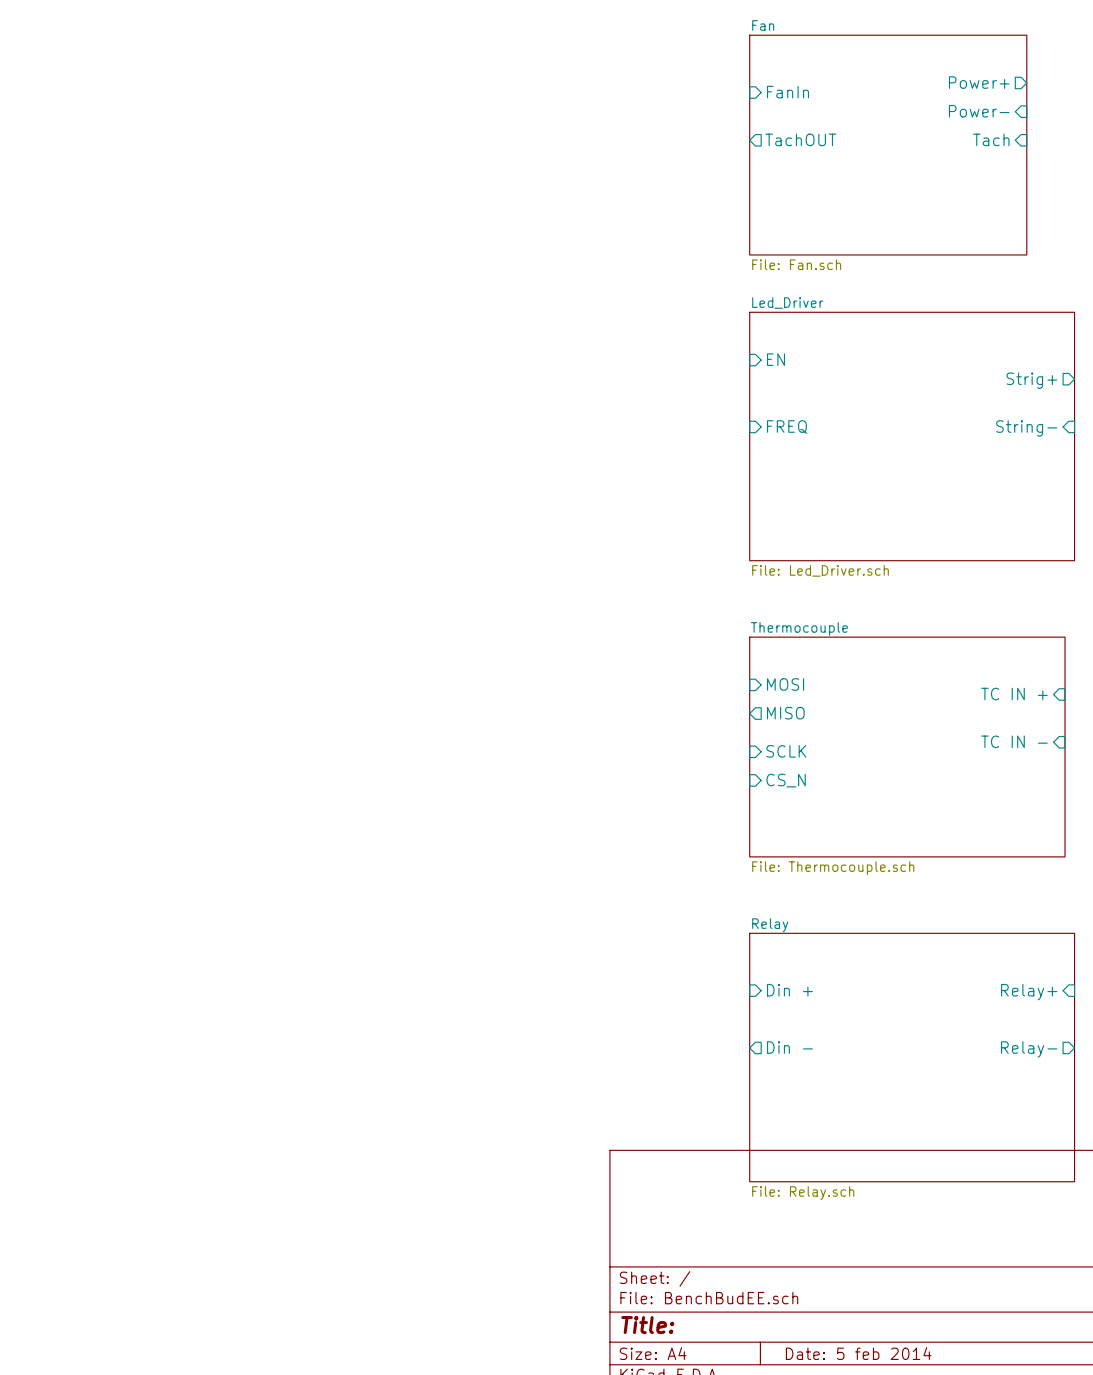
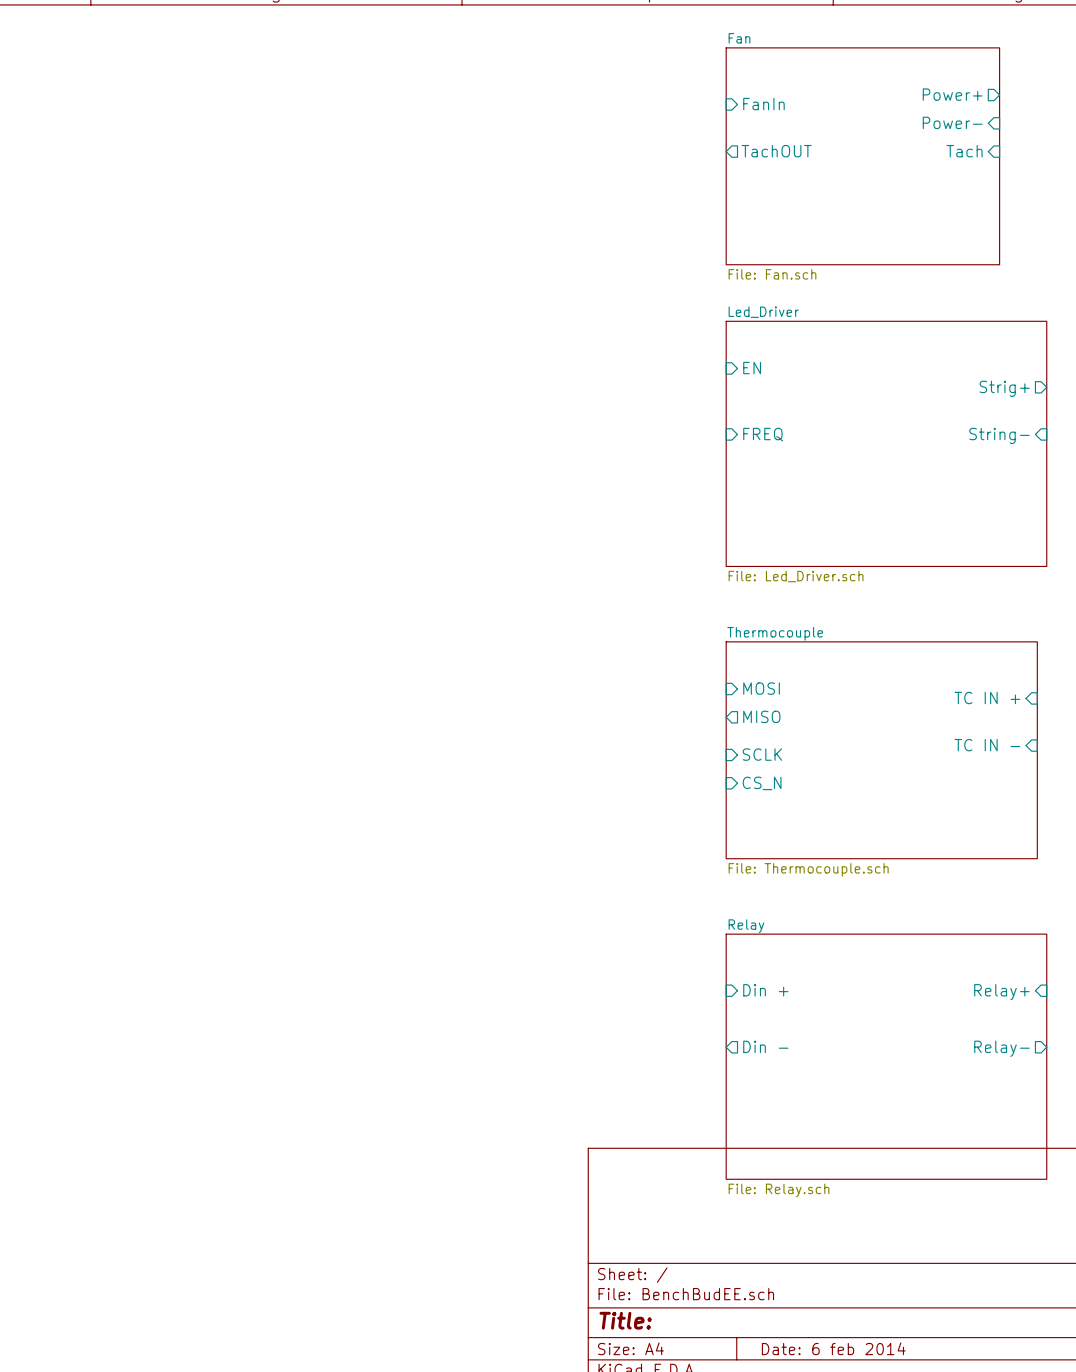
title block: Date: 5 feb 2014 (858, 1353) -> Date: 6 feb 2014 (833, 1348)

